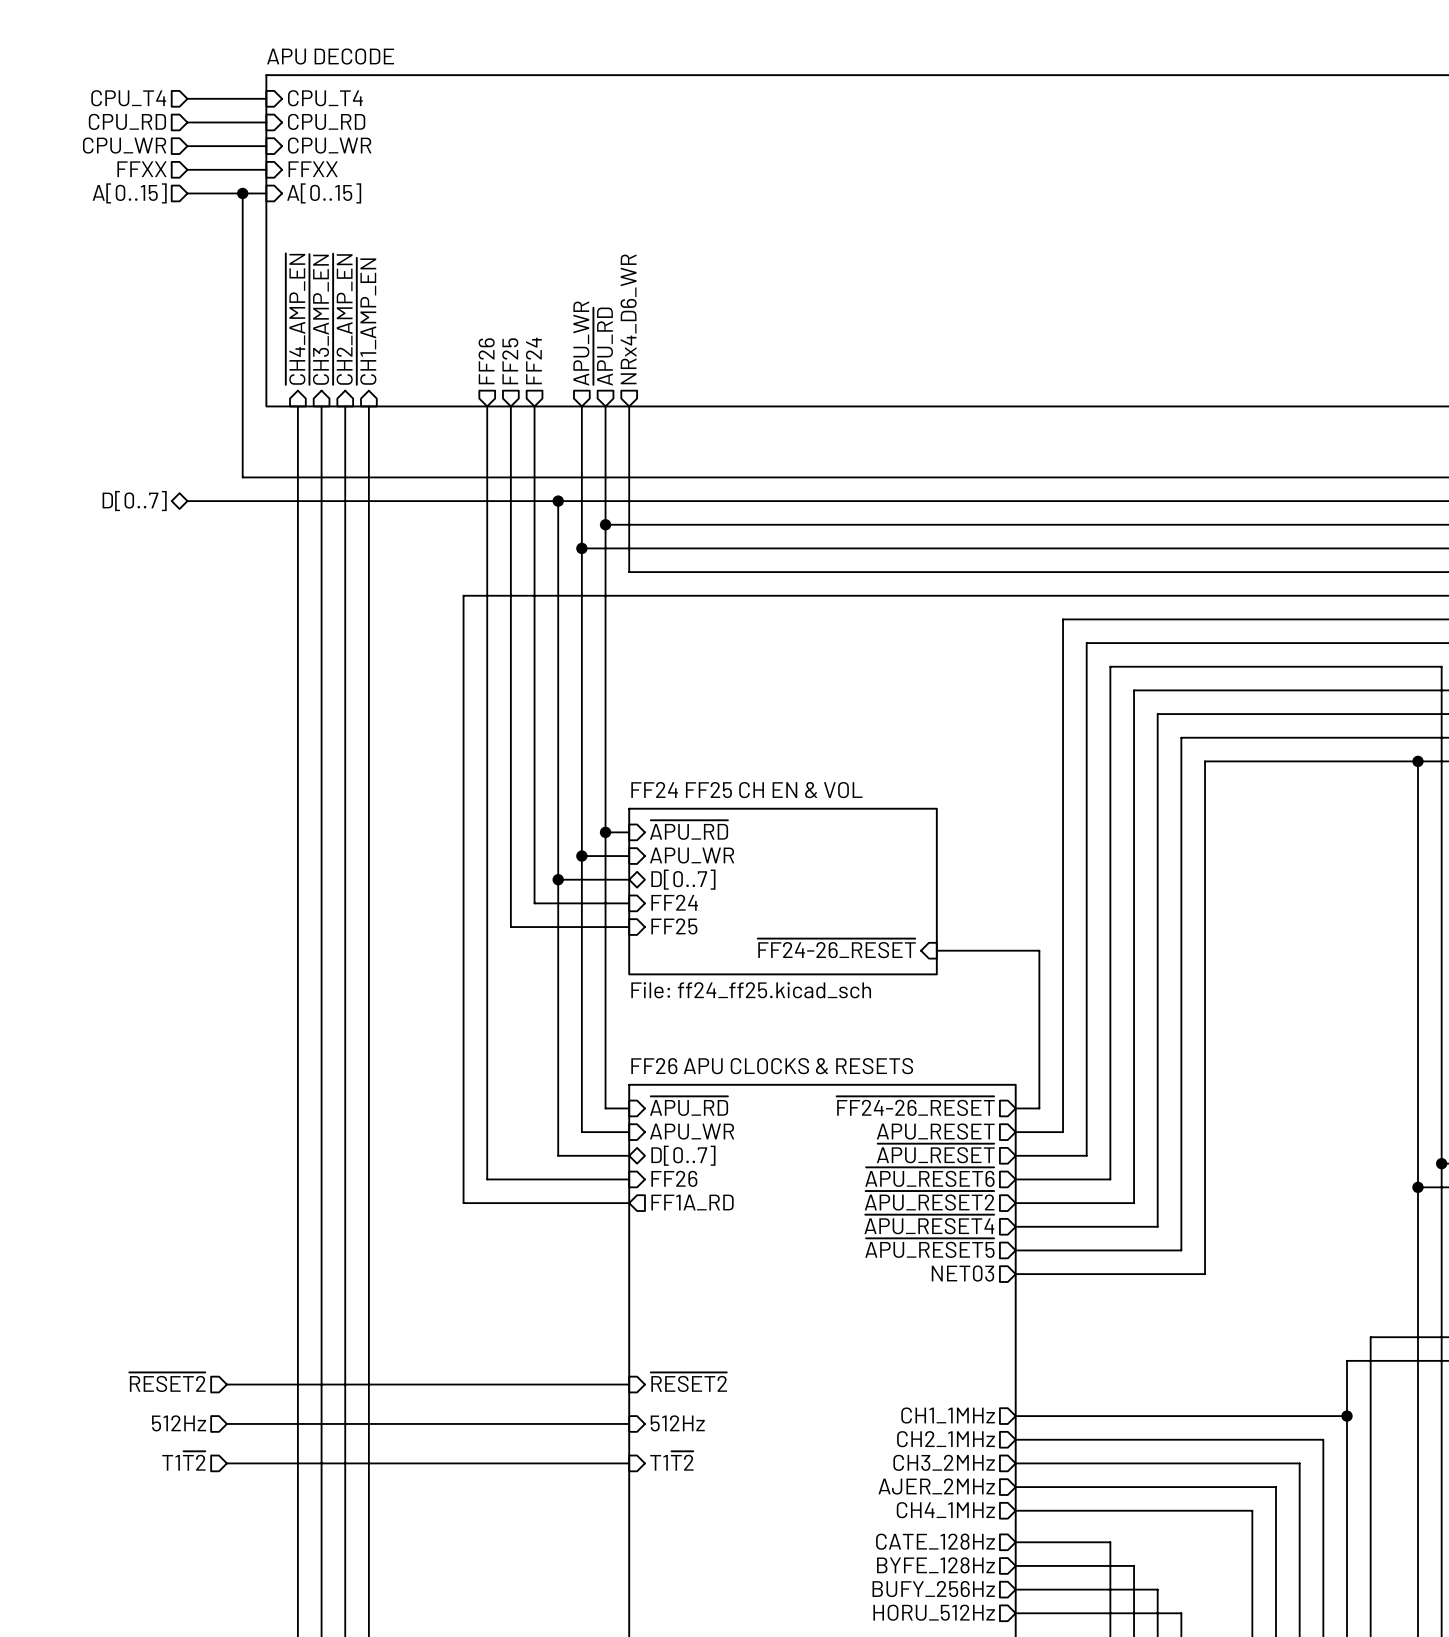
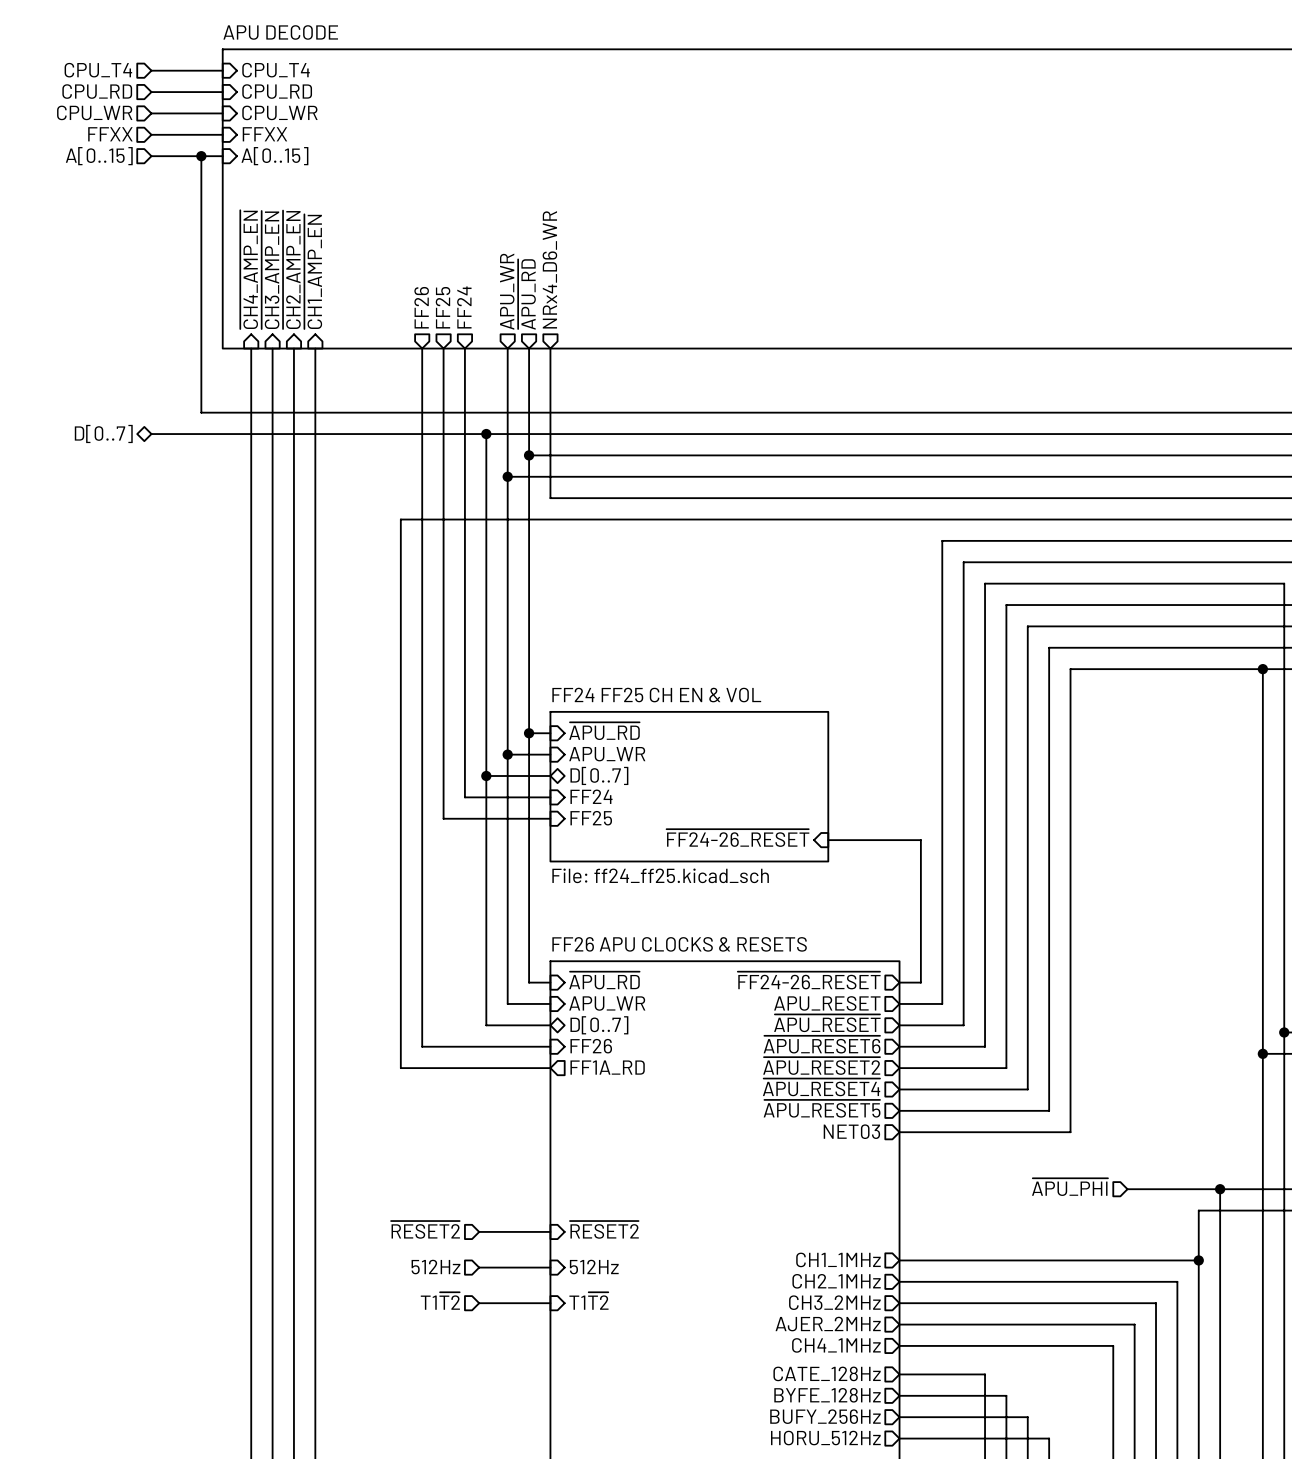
hierarchical label: none -> ~{APU_PHI} (1070, 1187)
wire: none -> (1127, 1189) (1220, 1189)
junction: none -> (1220, 1189)
hierarchical label: ~{RESET2} (167, 1382) -> none
hierarchical label: none -> ~{RESET2} (425, 1229)
wire: (226, 1384) (550, 1384) -> none
hierarchical label: 512Hz (179, 1423) -> none
wire: (226, 1423) (550, 1423) -> none
hierarchical label: none -> 512Hz (435, 1267)
hierarchical label: T1~{T2} (183, 1461) -> none
hierarchical label: none -> T1~{T2} (440, 1301)
wire: (226, 1463) (550, 1463) -> none

